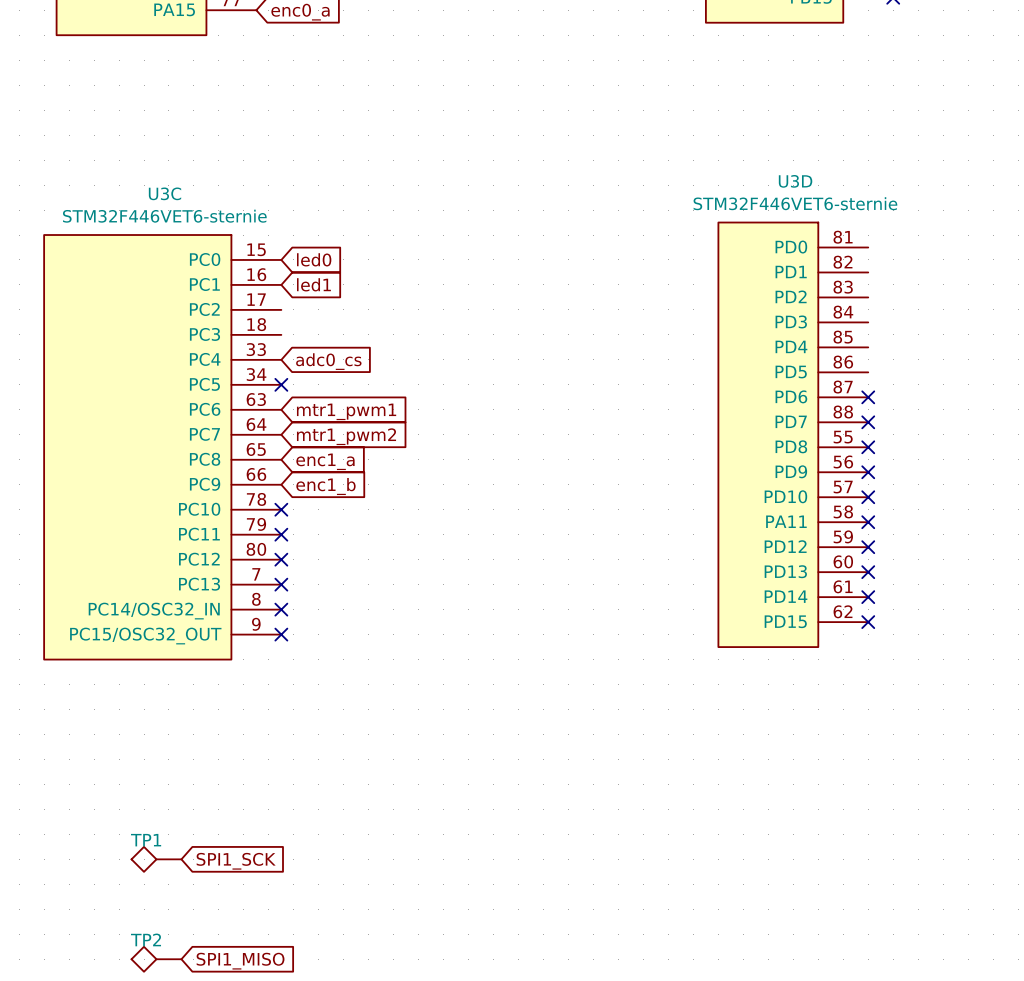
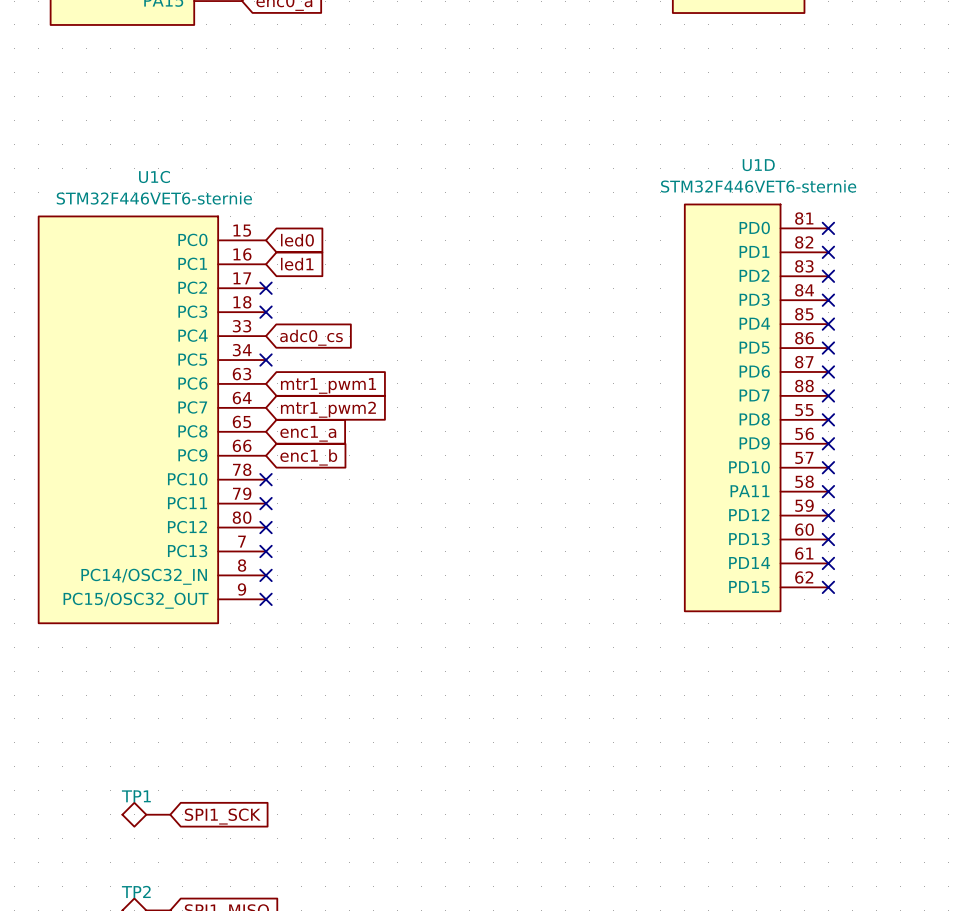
U3D name: U3D (795, 181) -> U1D (758, 165)
U3C name: U3C (165, 193) -> U1C (154, 176)
no-connect mark: none -> (828, 228)
no-connect mark: none -> (828, 252)
no-connect mark: none -> (828, 276)
no-connect mark: none -> (266, 288)
no-connect mark: none -> (828, 300)
no-connect mark: none -> (266, 312)
no-connect mark: none -> (828, 324)
no-connect mark: none -> (828, 348)

